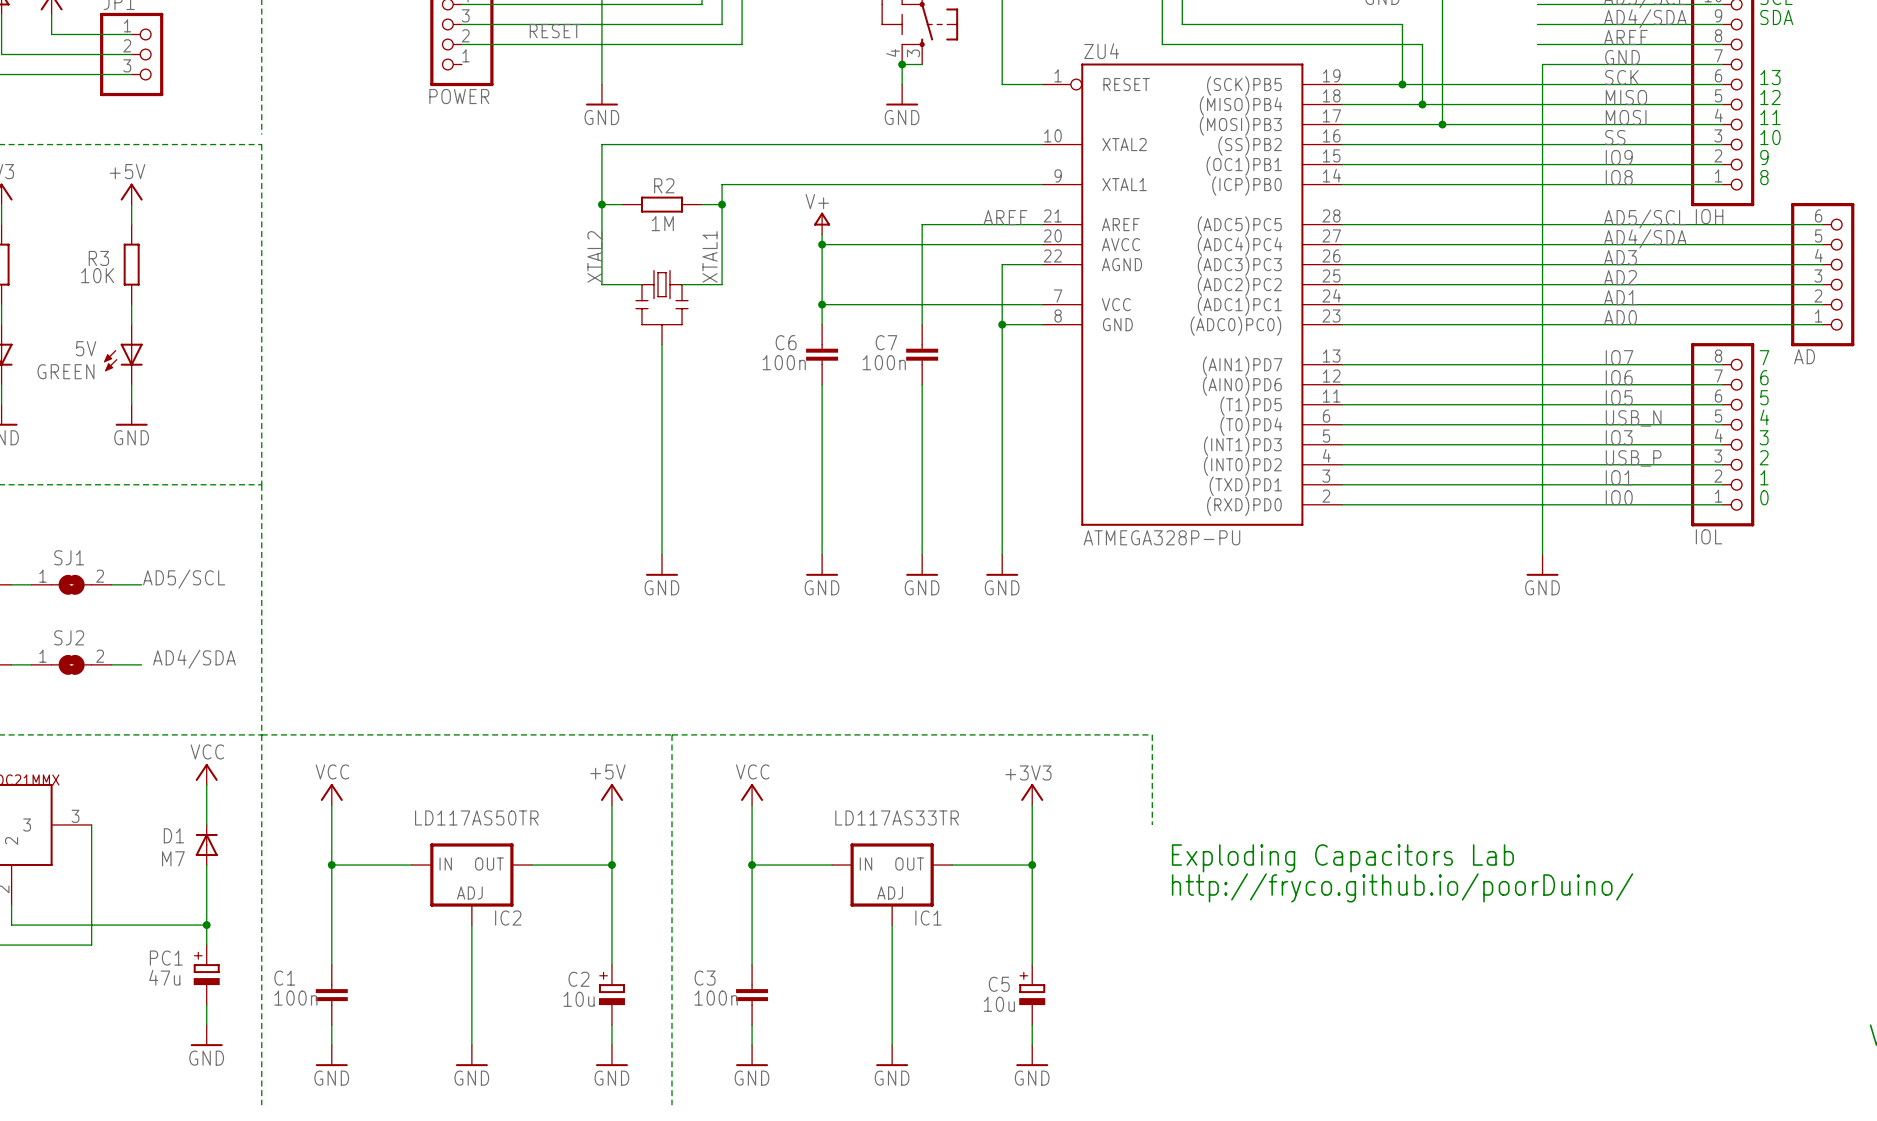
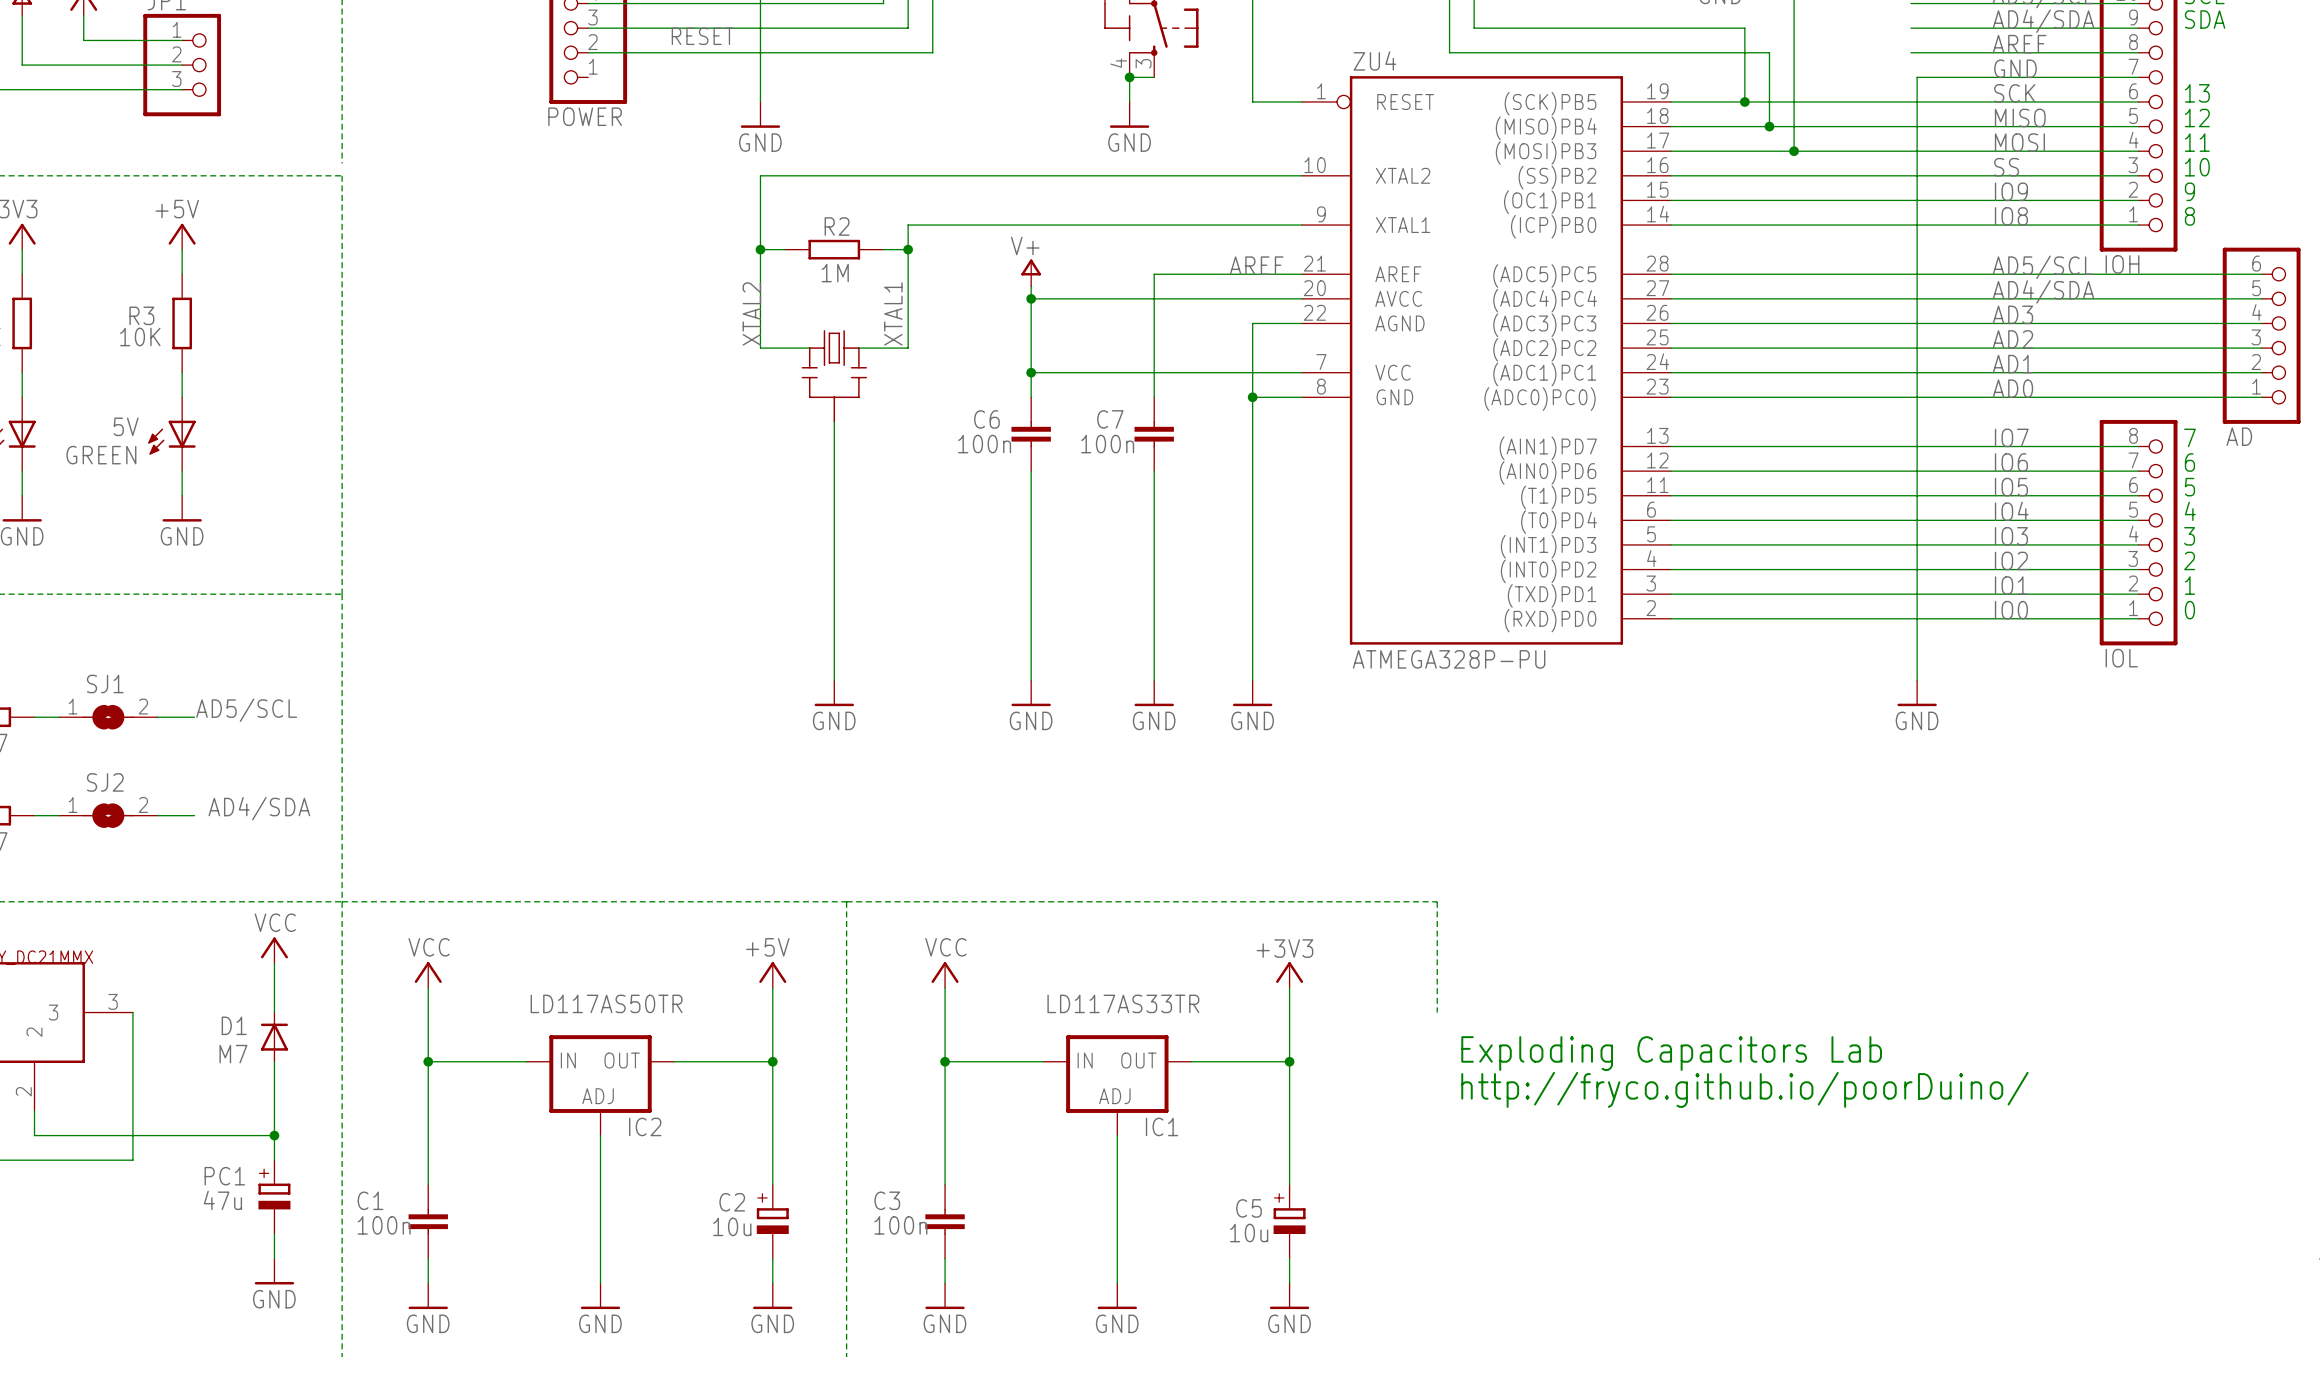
label: USB_N (1633, 418) -> IO4 (2011, 511)
label: USB_P (1633, 458) -> IO2 (2011, 560)

